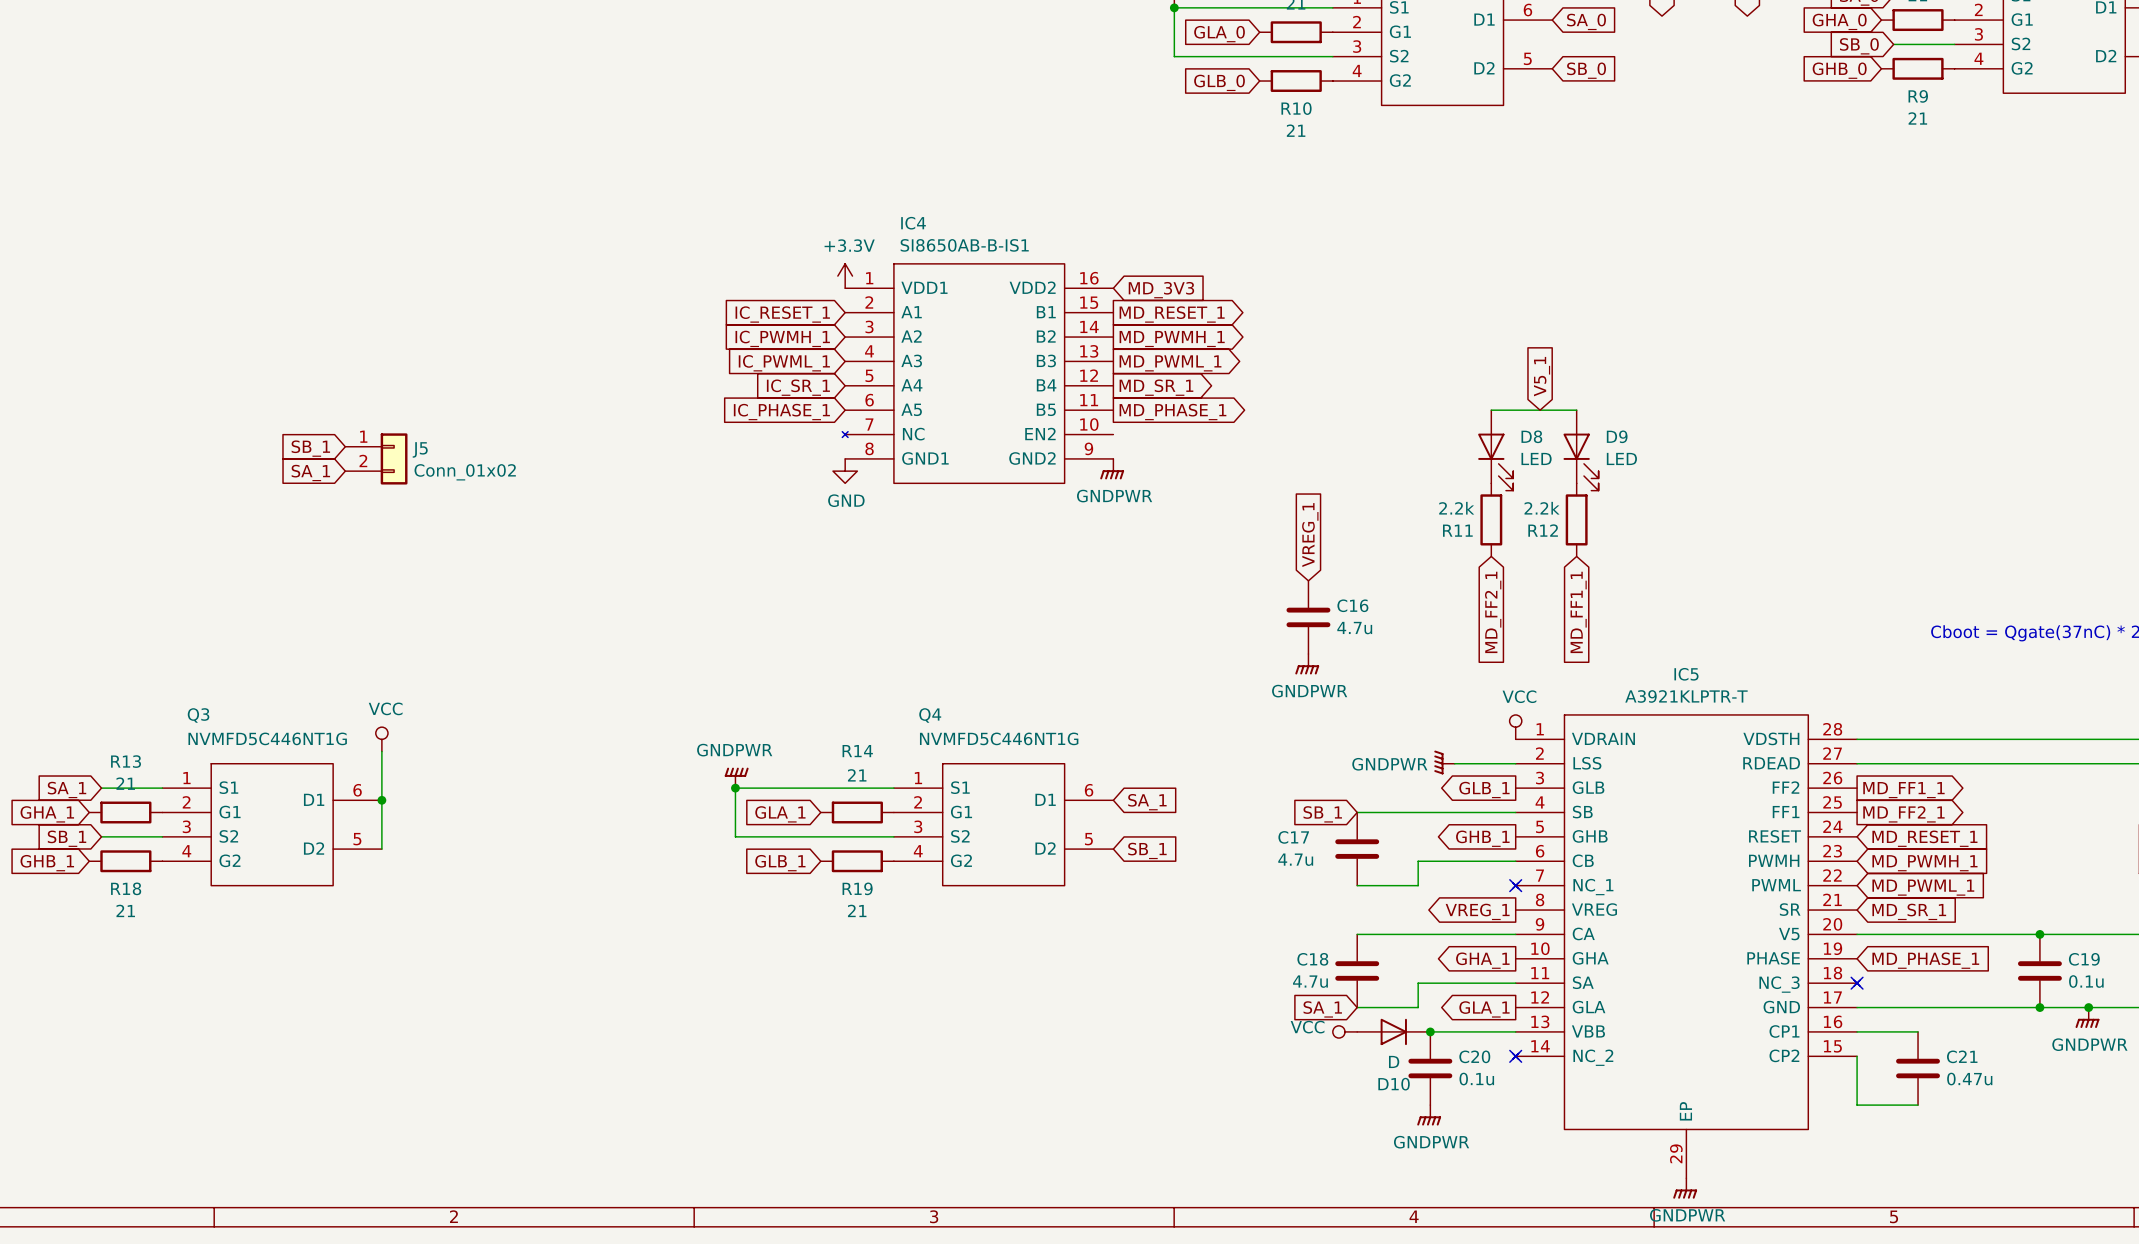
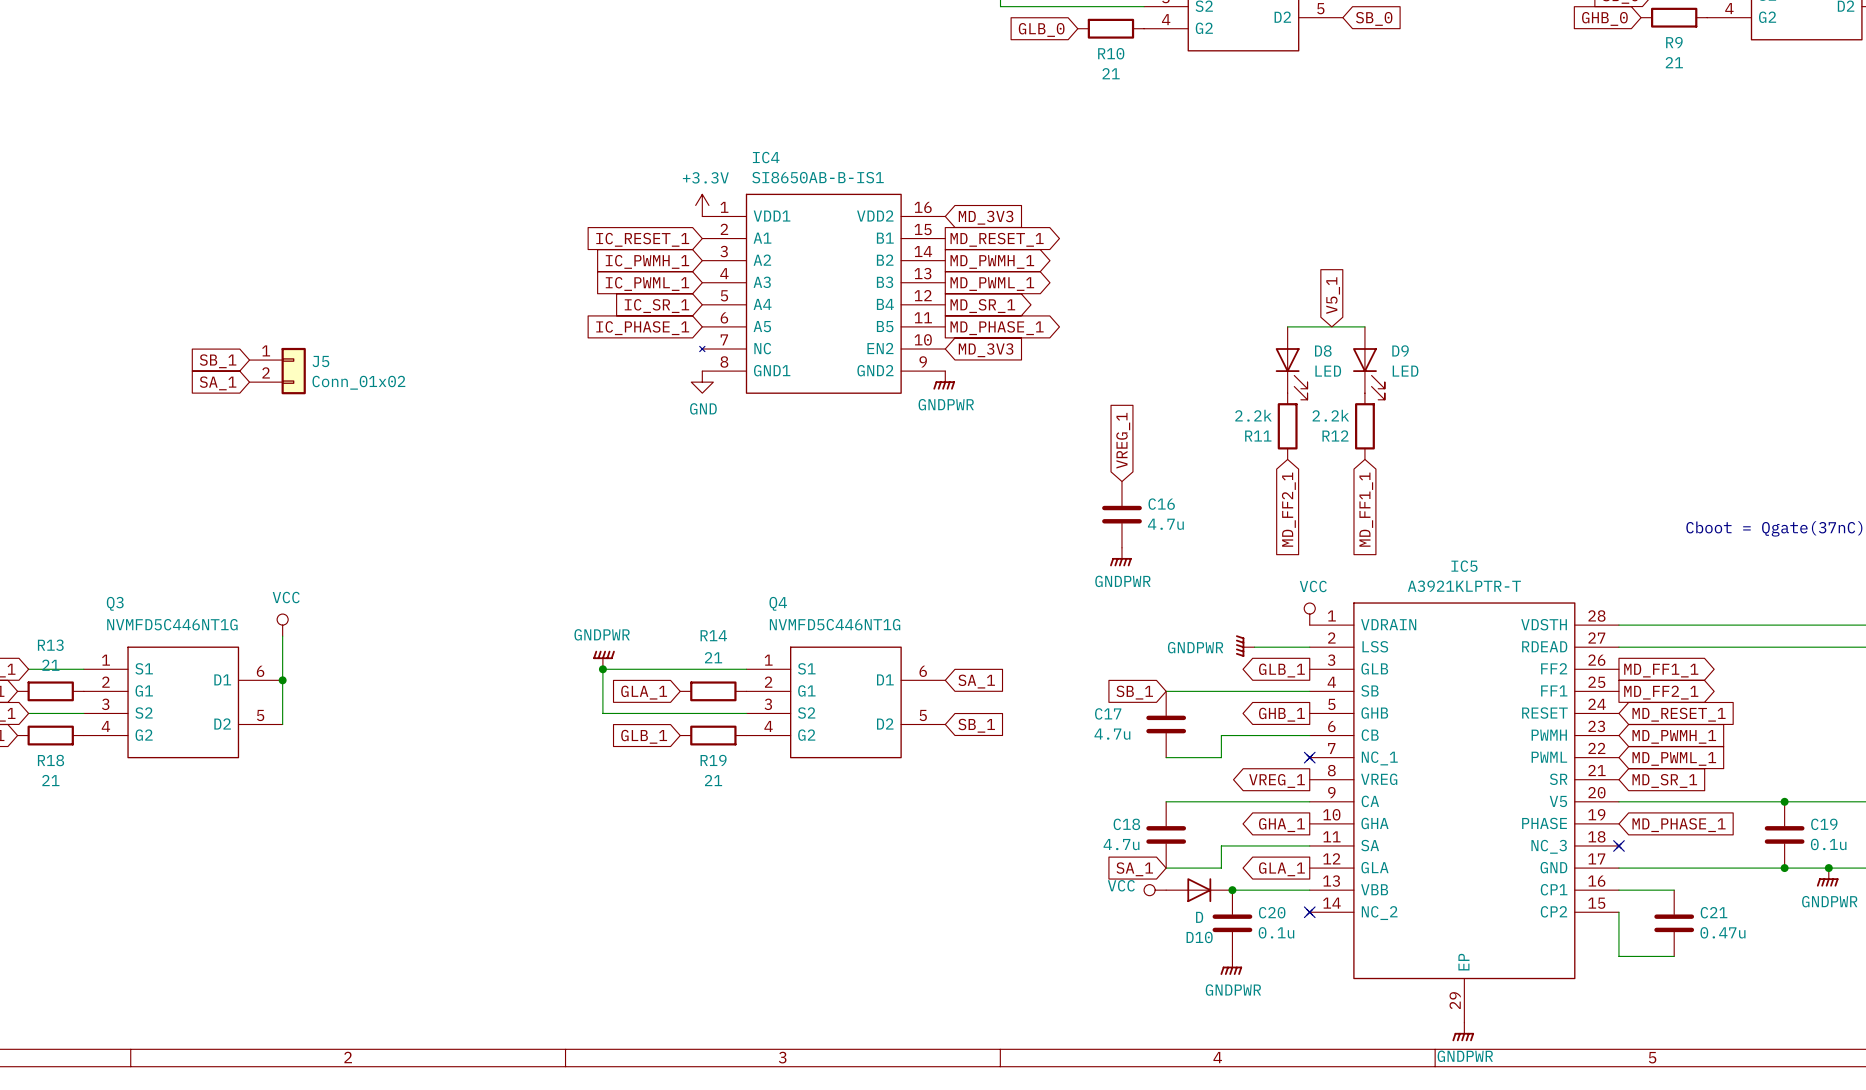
global label: none -> MD_3V3 (986, 350)

